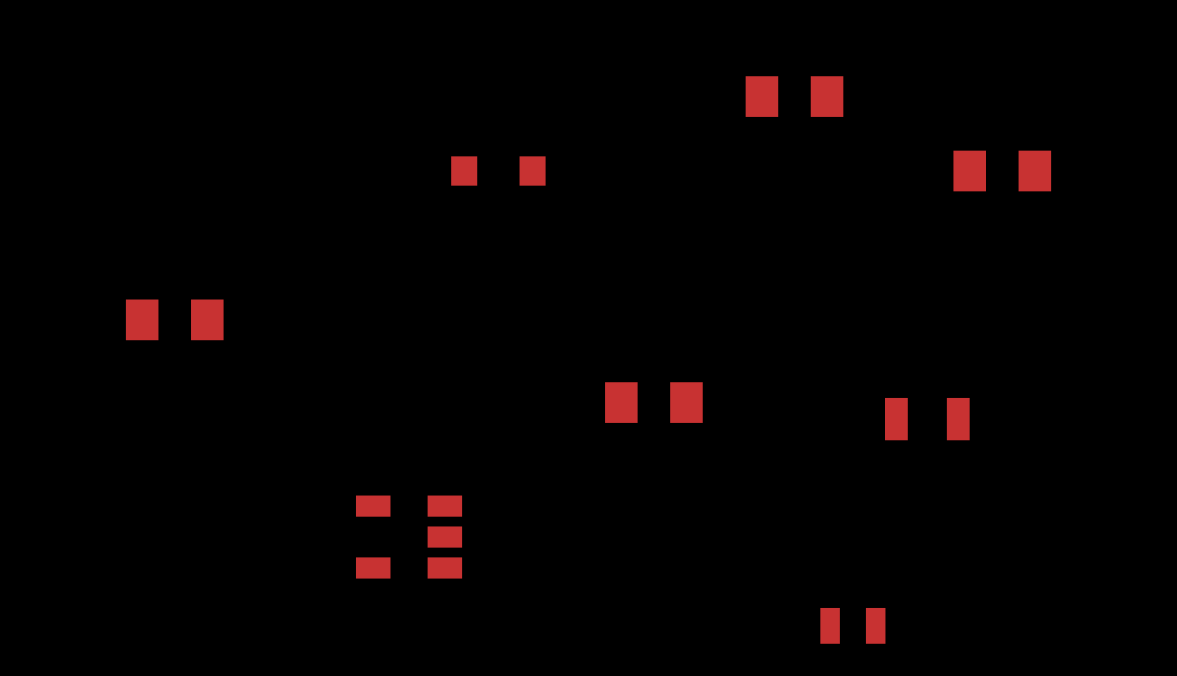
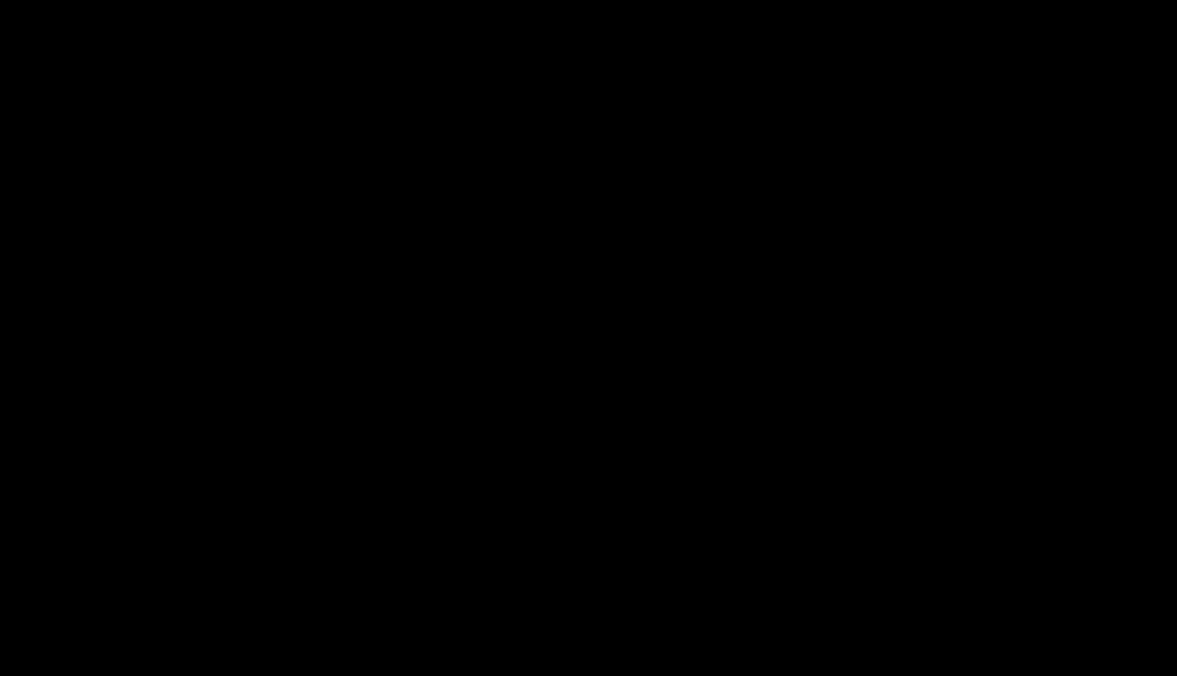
part: (794, 96) -> none
part: (498, 171) -> none
part: (1002, 171) -> none
part: (174, 319) -> none
part: (653, 402) -> none
part: (927, 419) -> none
part: (409, 537) -> none
part: (852, 625) -> none

